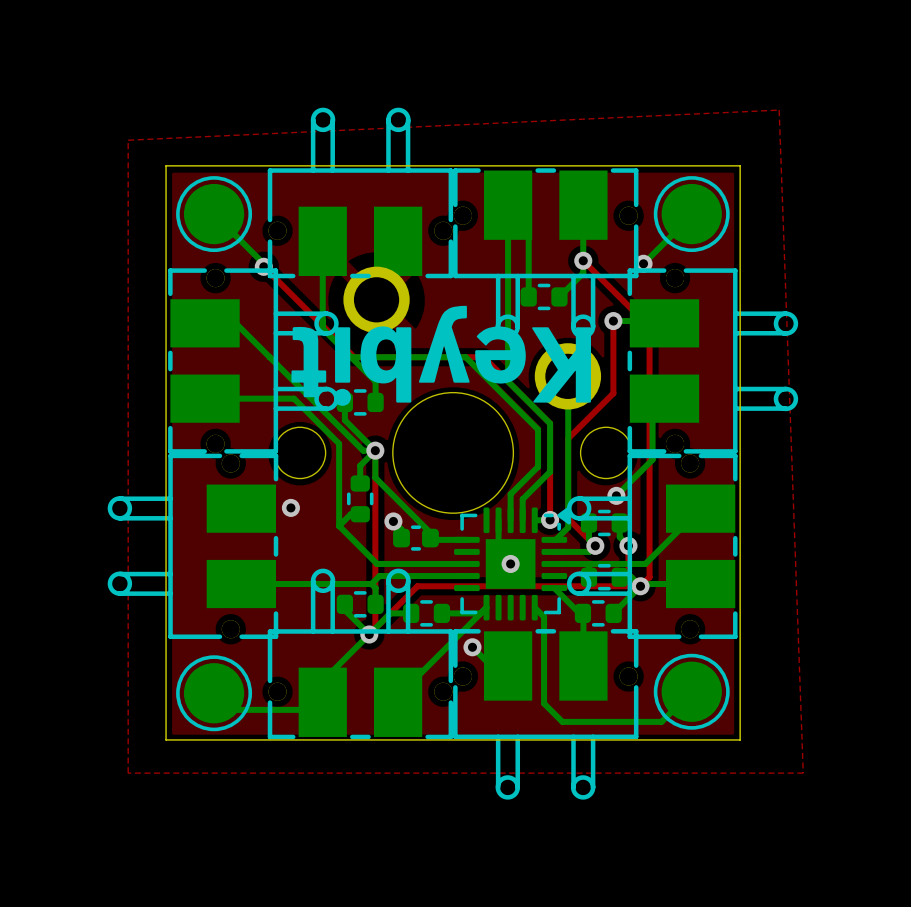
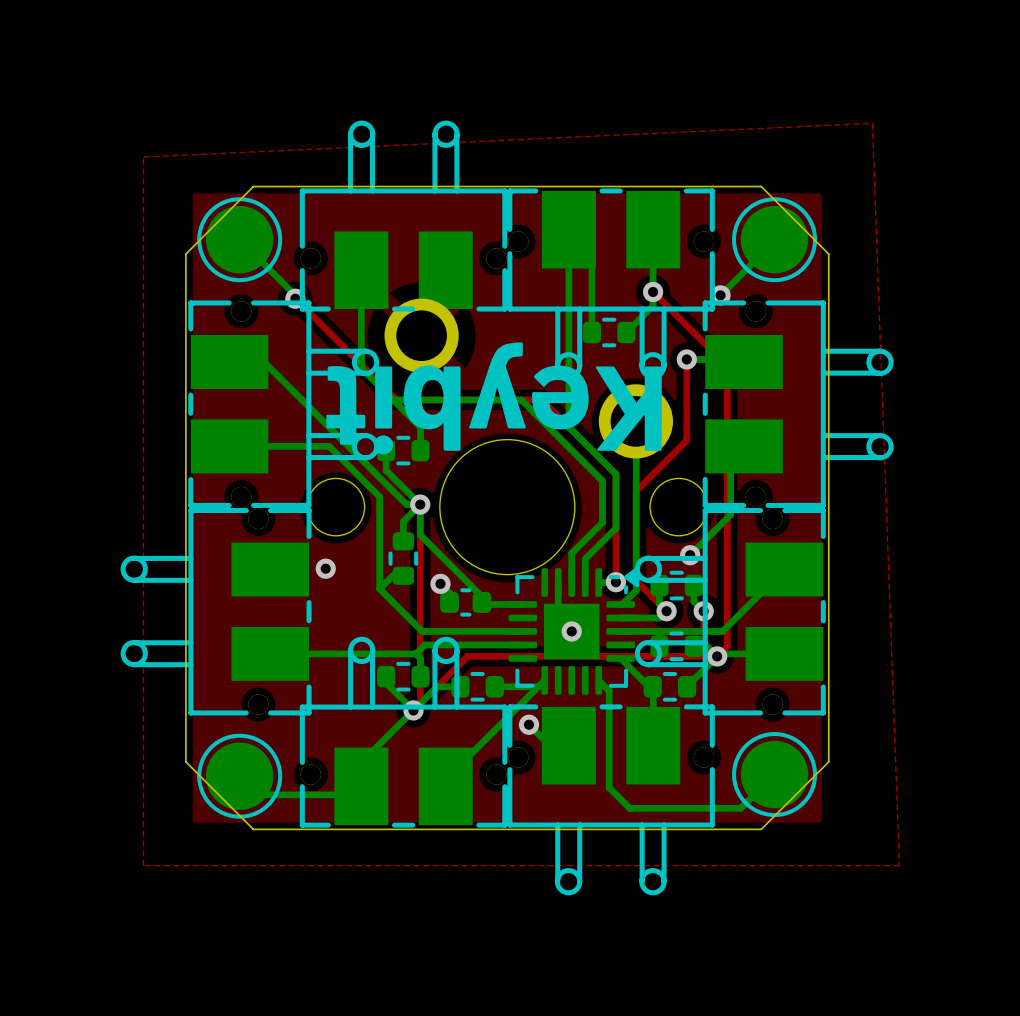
board edge: (740, 226) (740, 165) (166, 165) (166, 226) -> (828, 254) (761, 186) (253, 186) (185, 254)
board edge: (740, 680) (740, 739) (166, 739) (166, 680) -> (828, 761) (761, 829) (253, 829) (185, 761)

